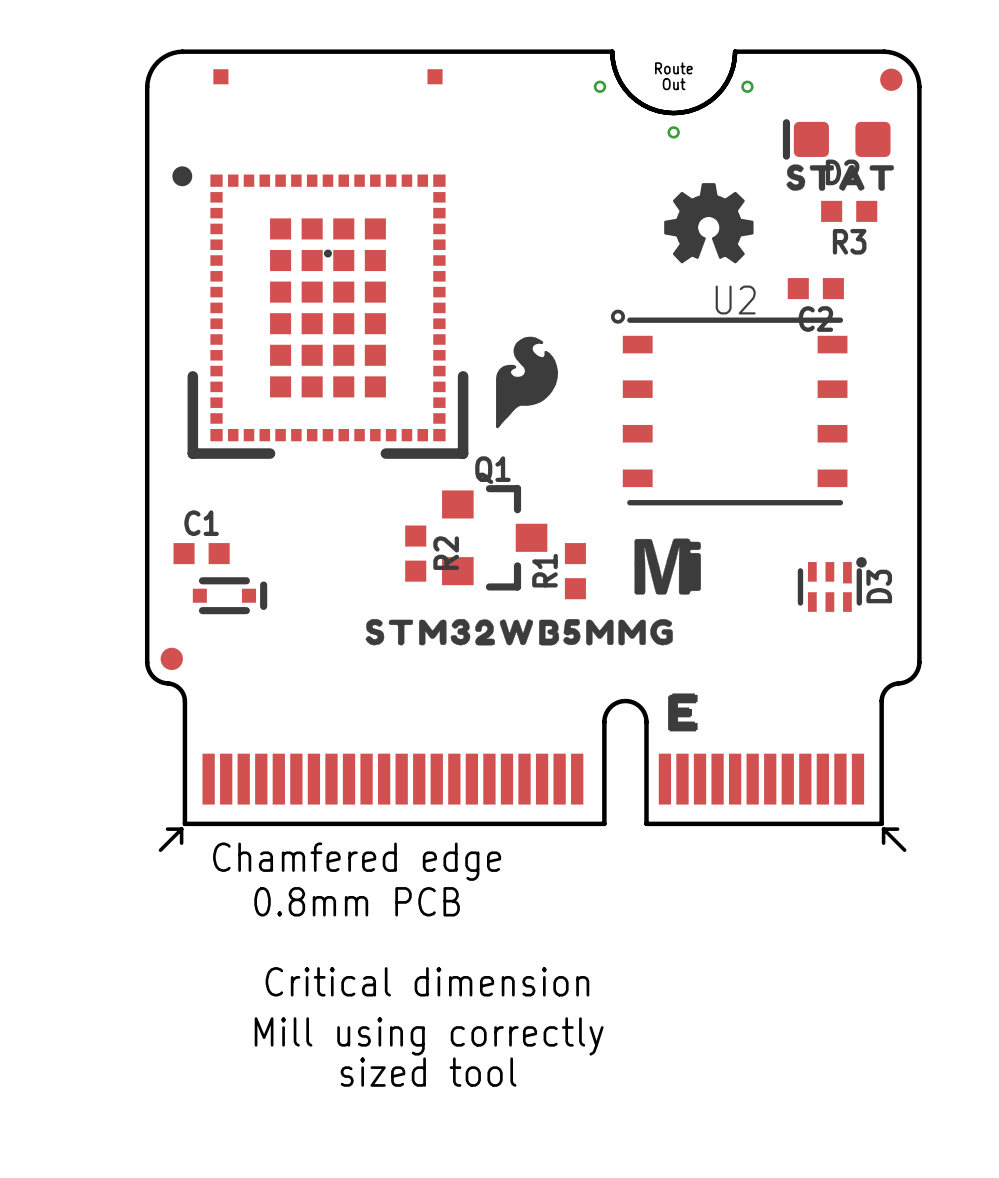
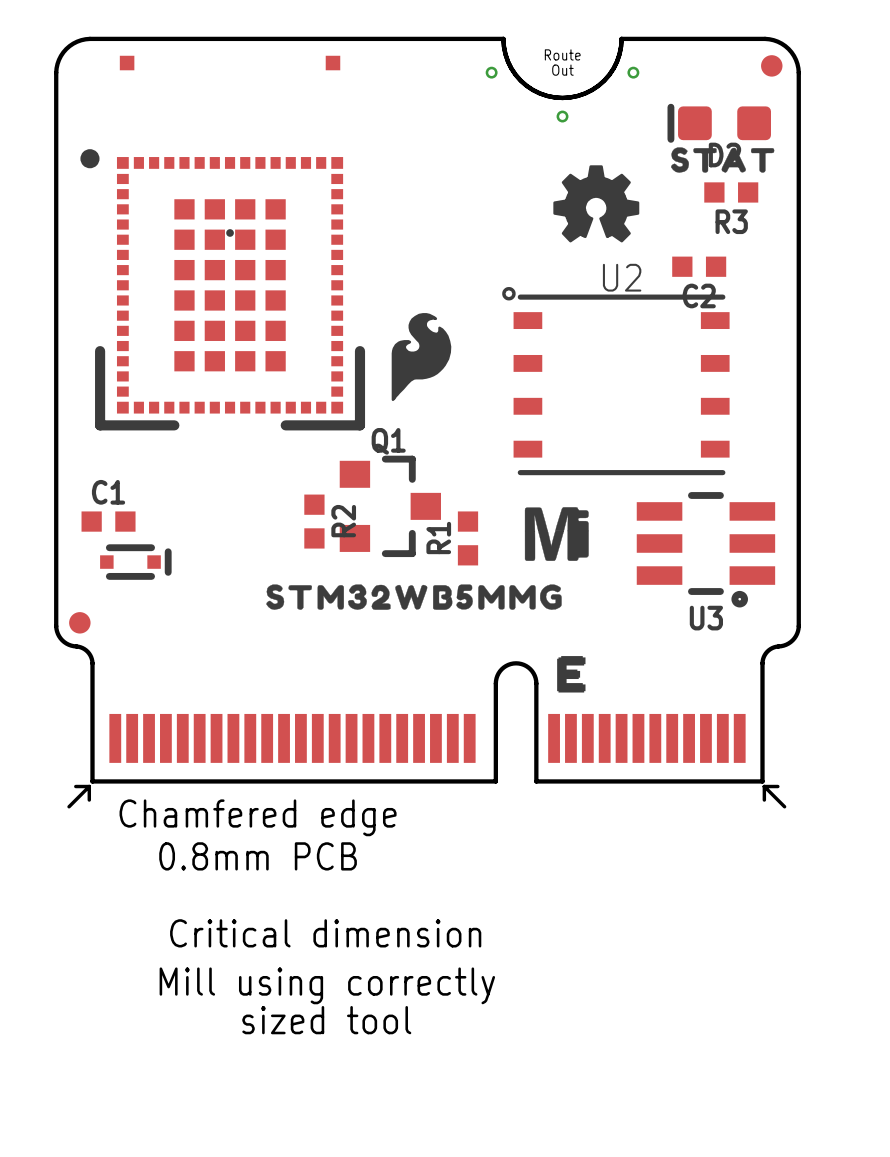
U3: none -> (705, 549)
D3: (832, 584) -> none

